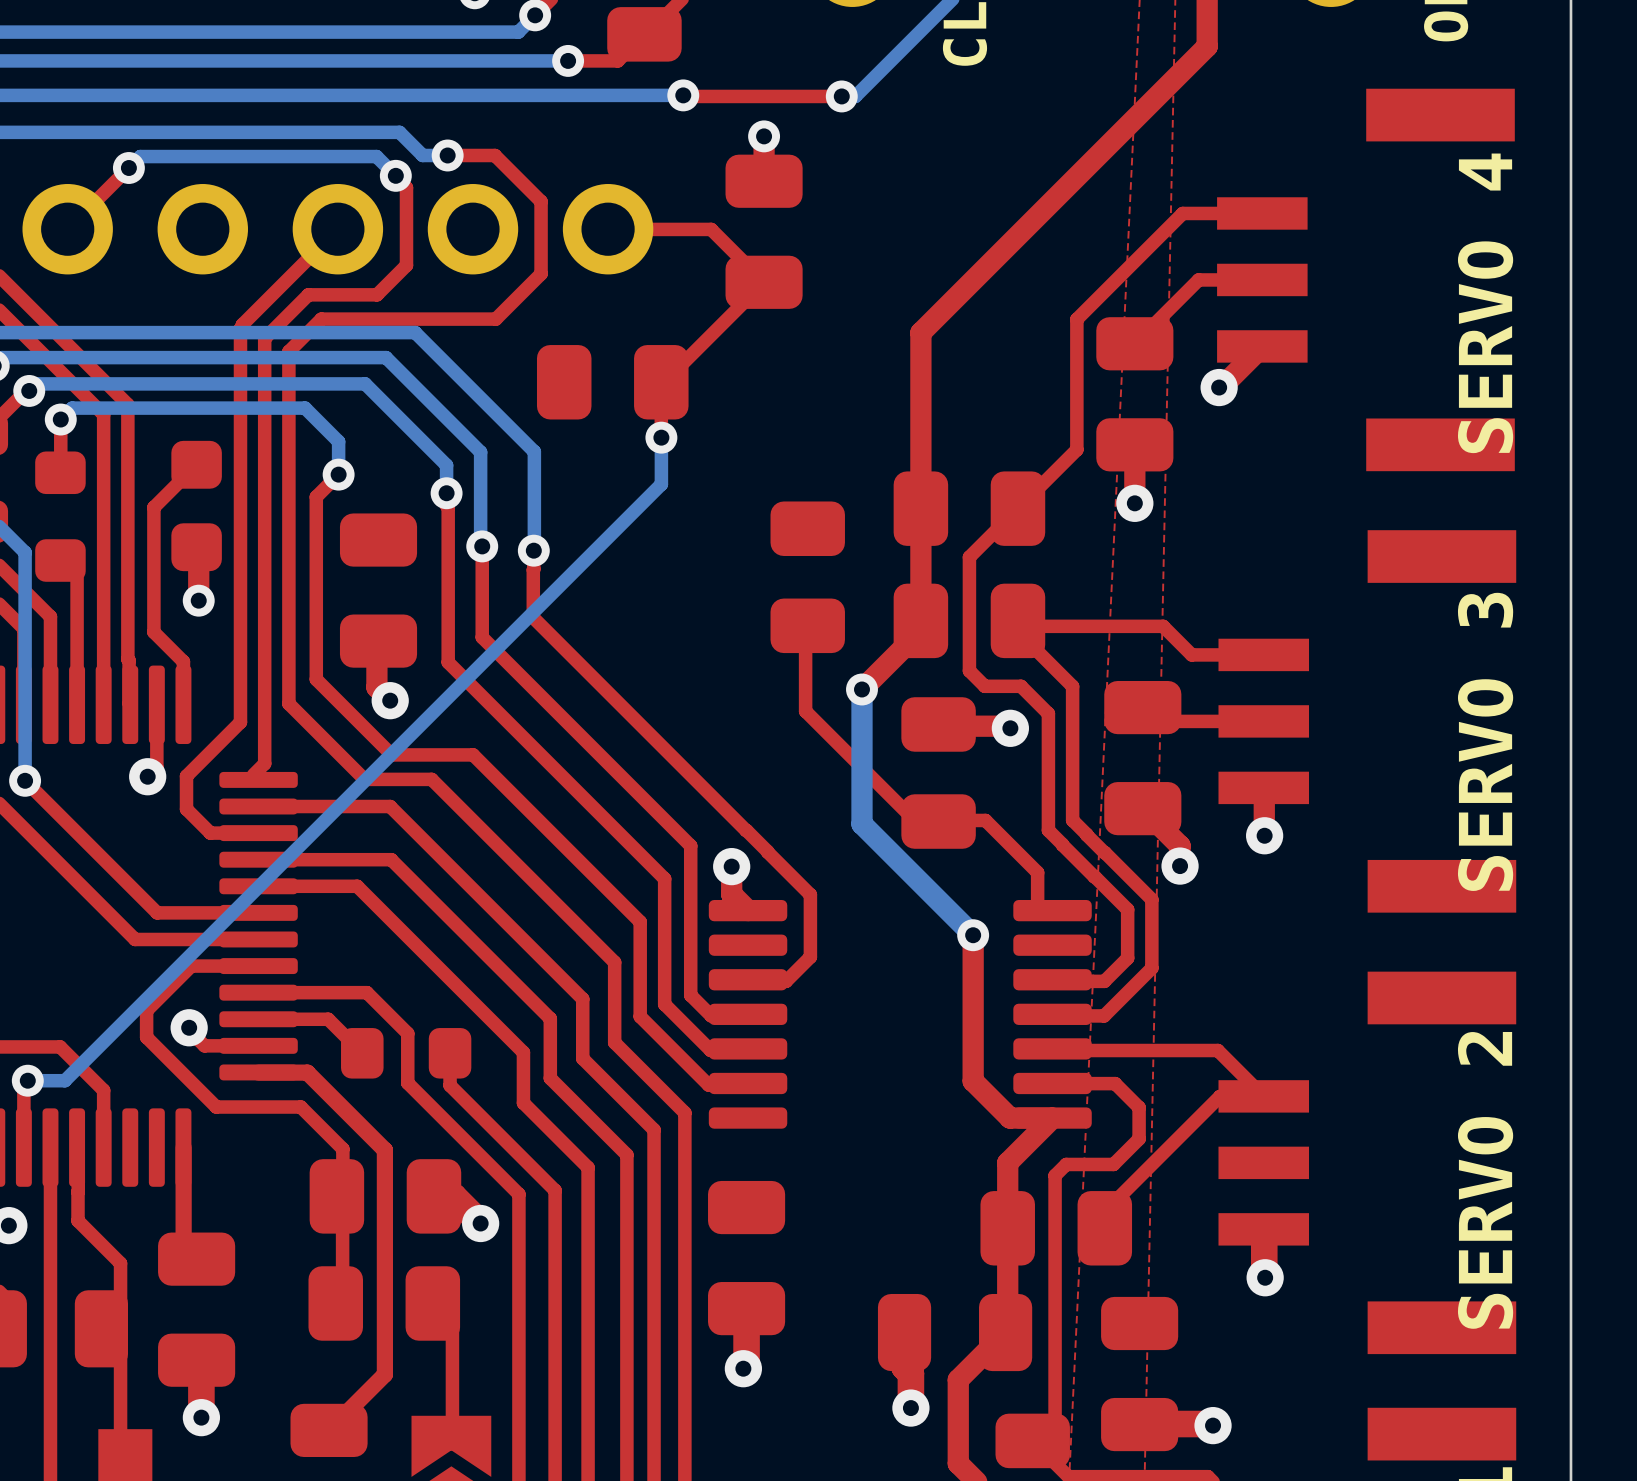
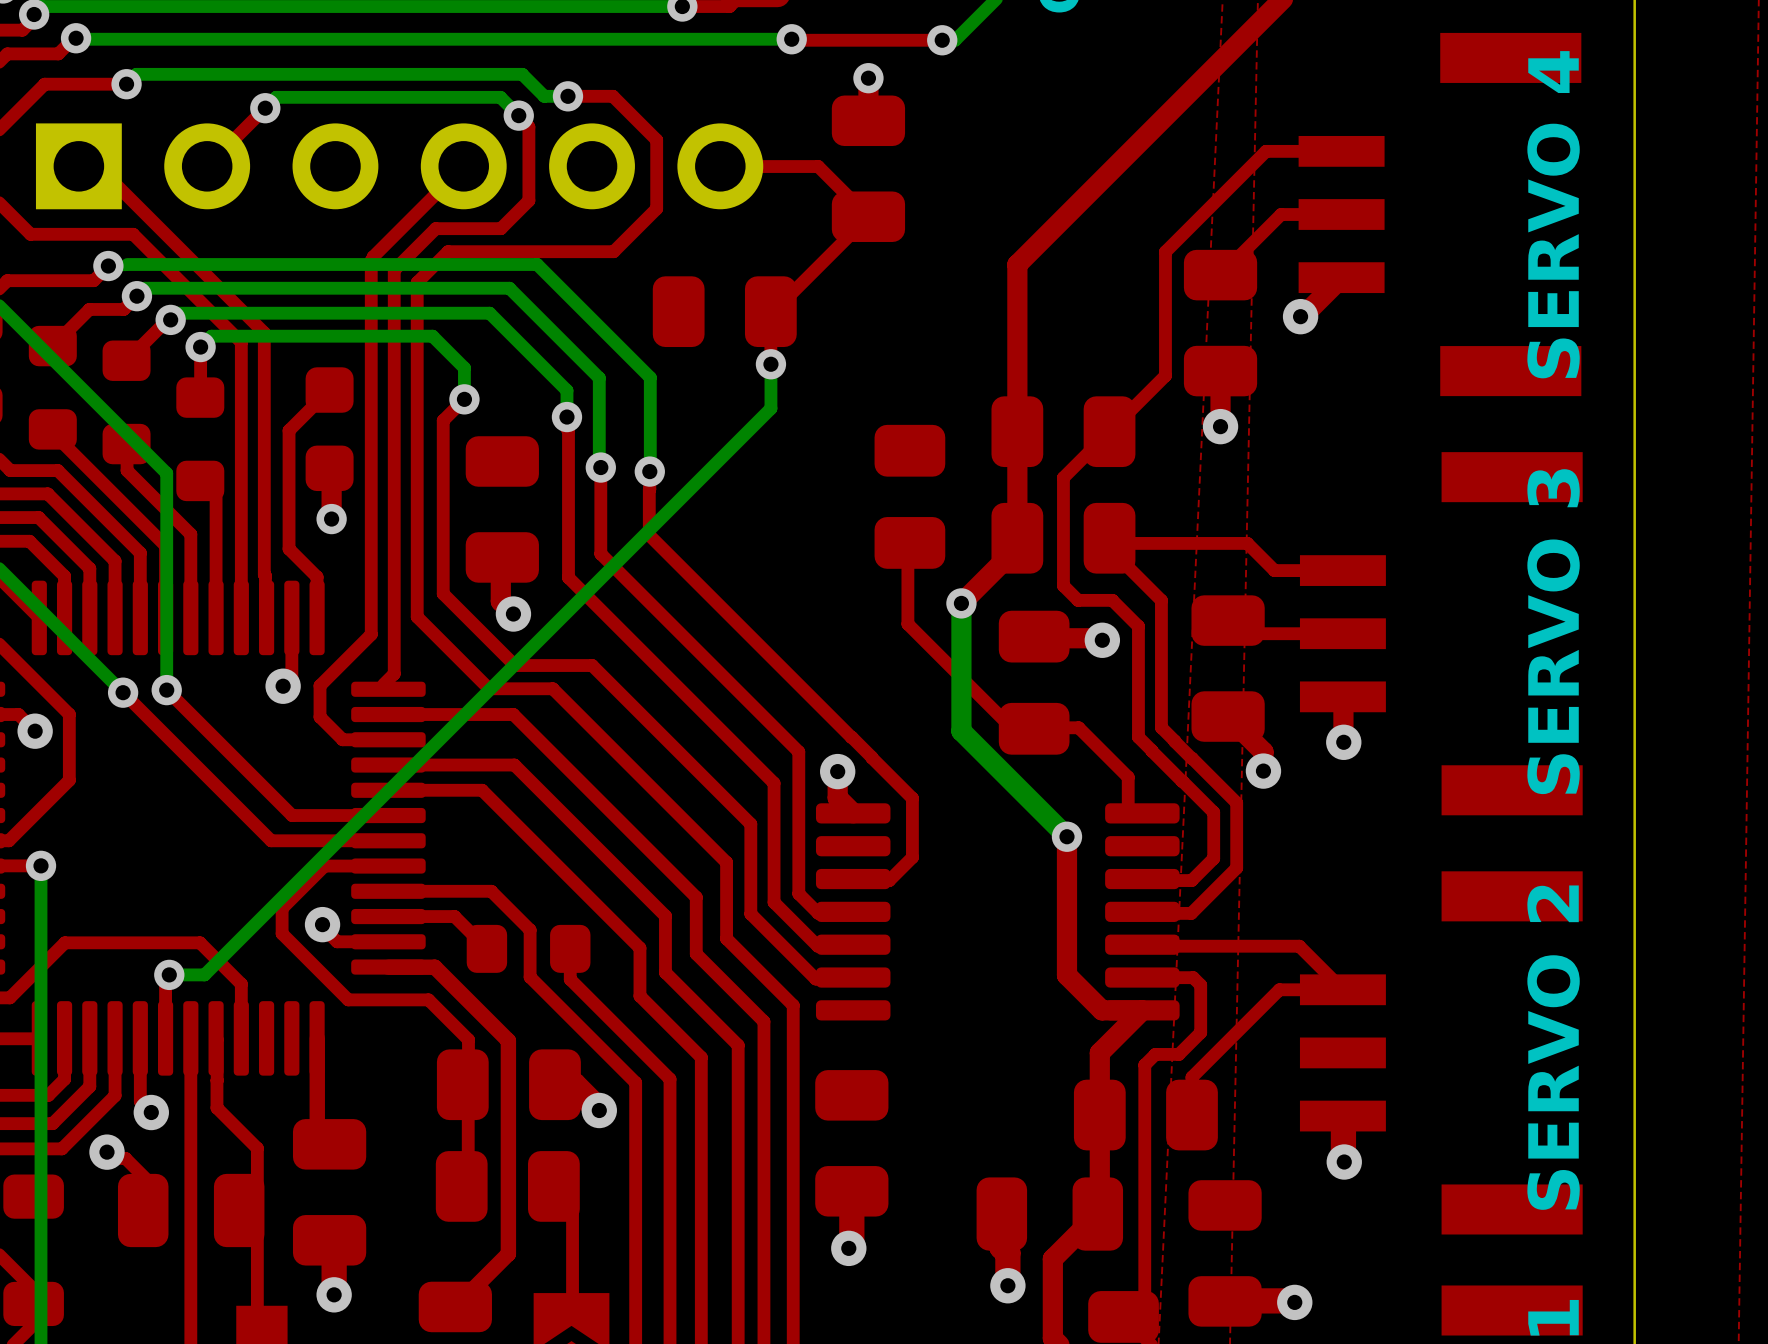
top track: (1106, 1083) (1115, 1083) (1139, 1107) (1139, 1138) (1113, 1164) (1091, 1164) -> (1193, 977) (1200, 985) (1200, 1032) (1178, 1054)
top track: (1220, 1096) (1089, 1227) -> (1301, 989) (1279, 989) (1191, 1077) (1191, 1115)

